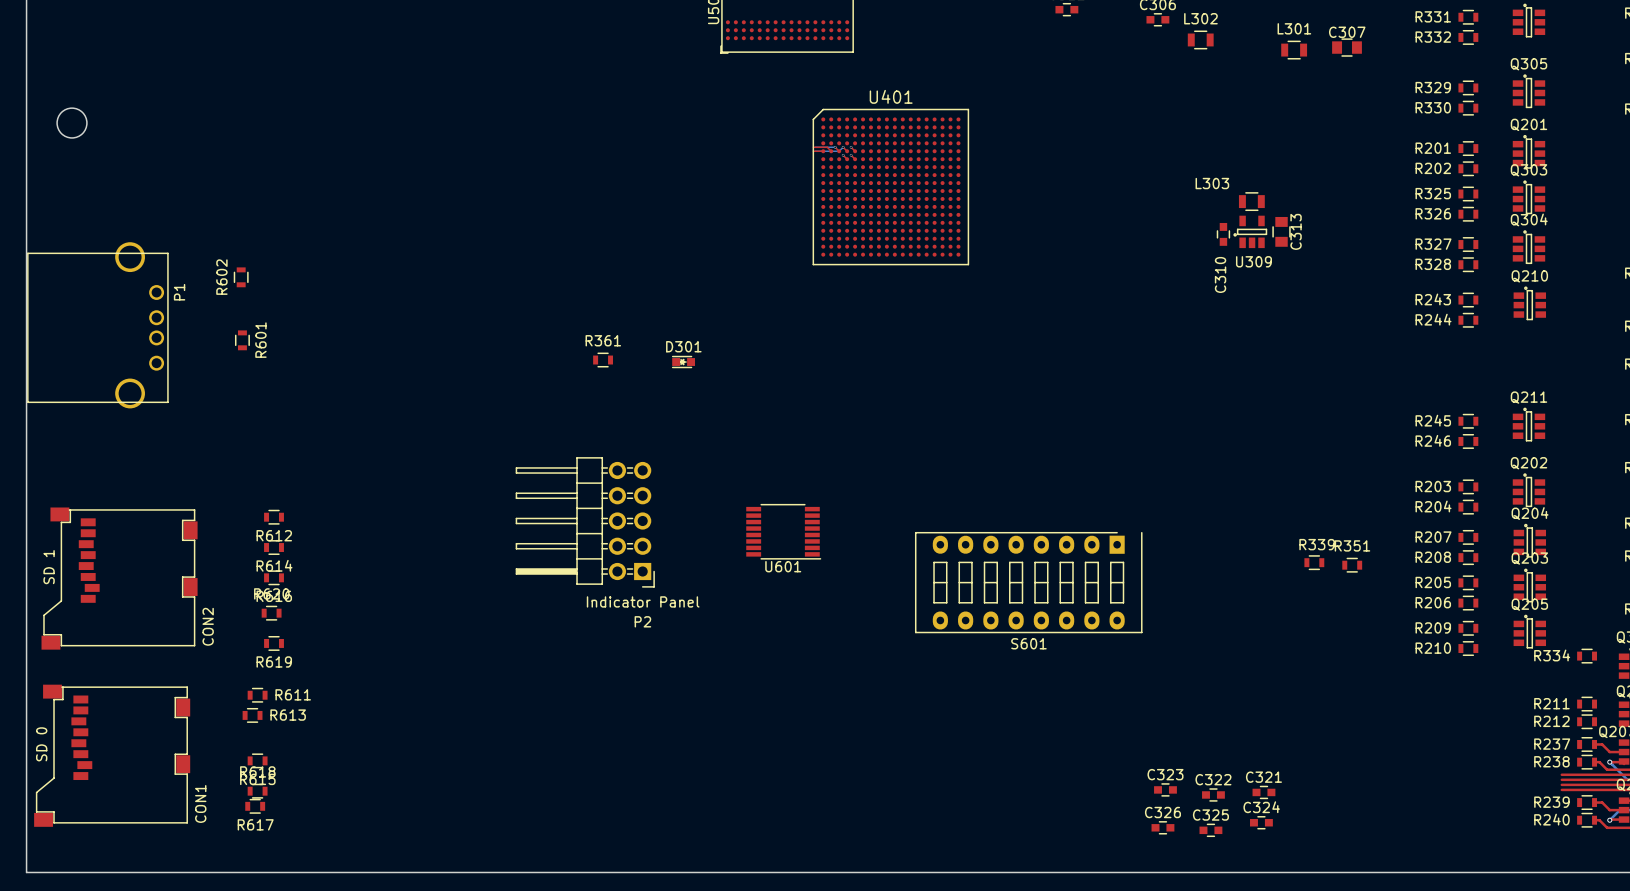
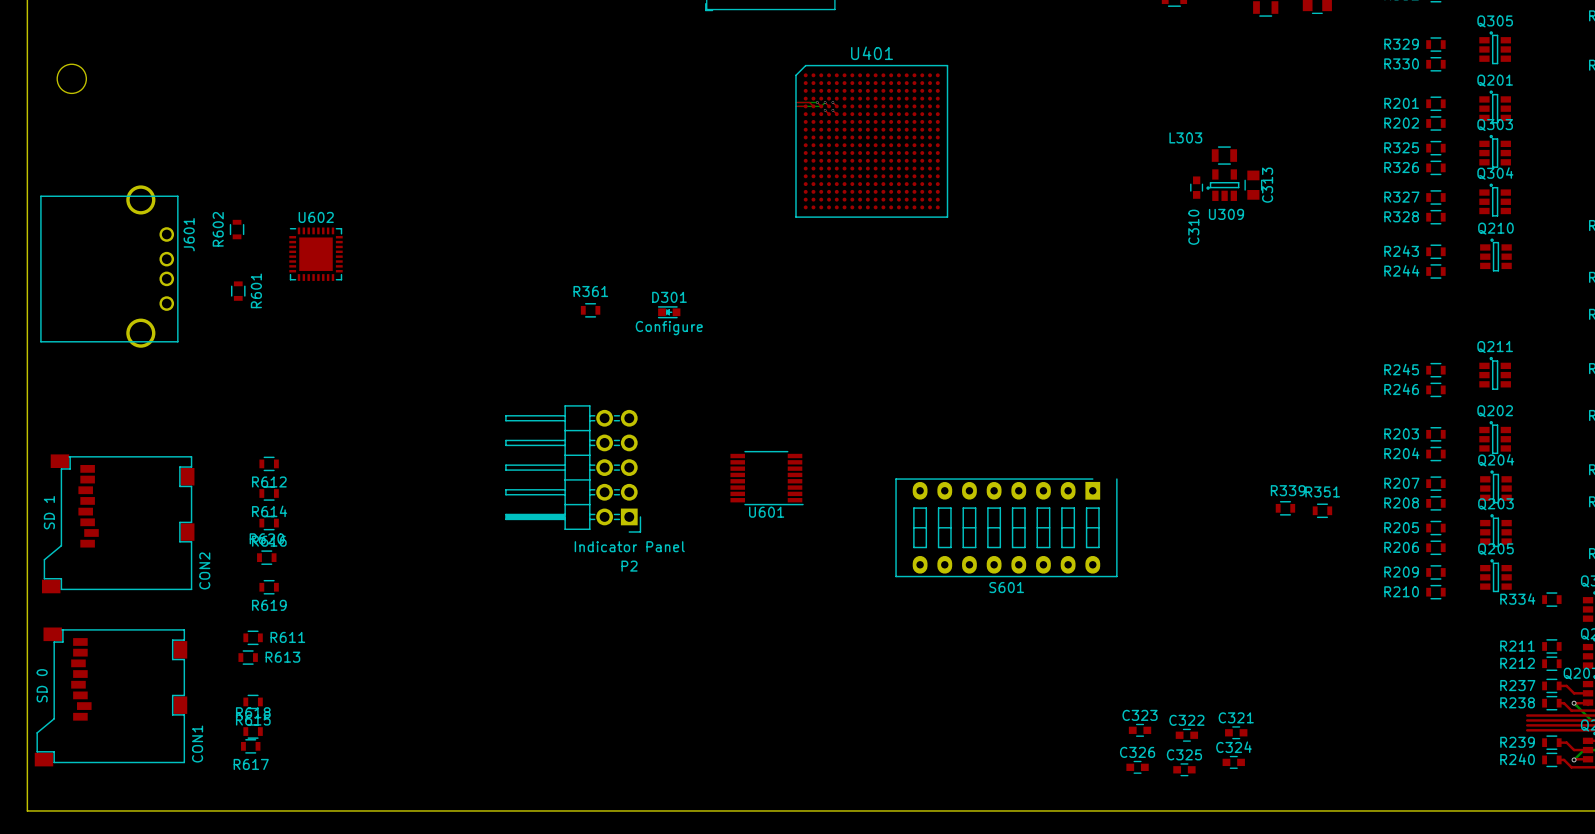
U602: none -> (315, 254)
J601: none -> (109, 266)
P1: (97, 325) -> none
D301 value: none -> Configure (669, 328)

